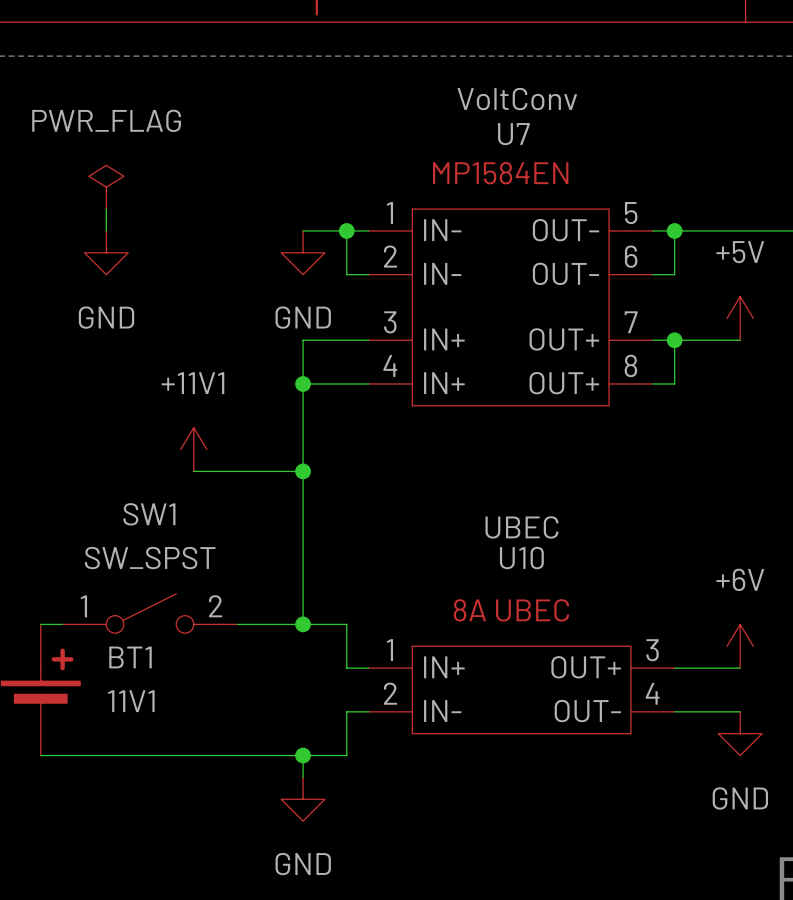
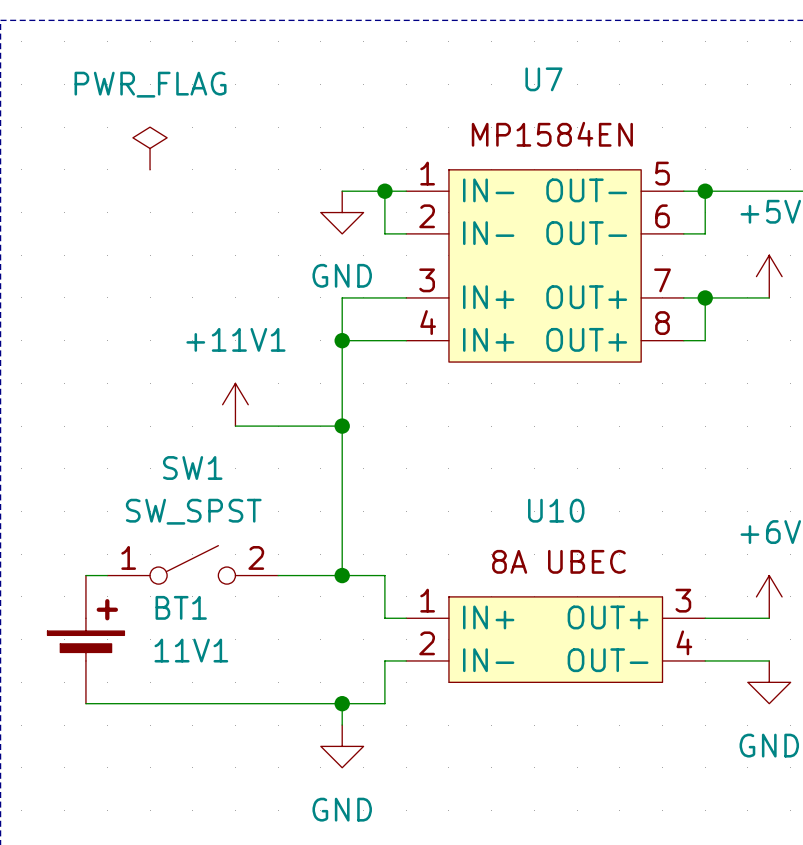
U7 value: VoltConv (517, 99) -> none
U7 name position: U7 (513, 134) -> U7 (543, 79)
wire: (106, 209) (106, 230) -> none
power symbol: GND (106, 252) -> none
U10 value: UBEC (521, 527) -> none

